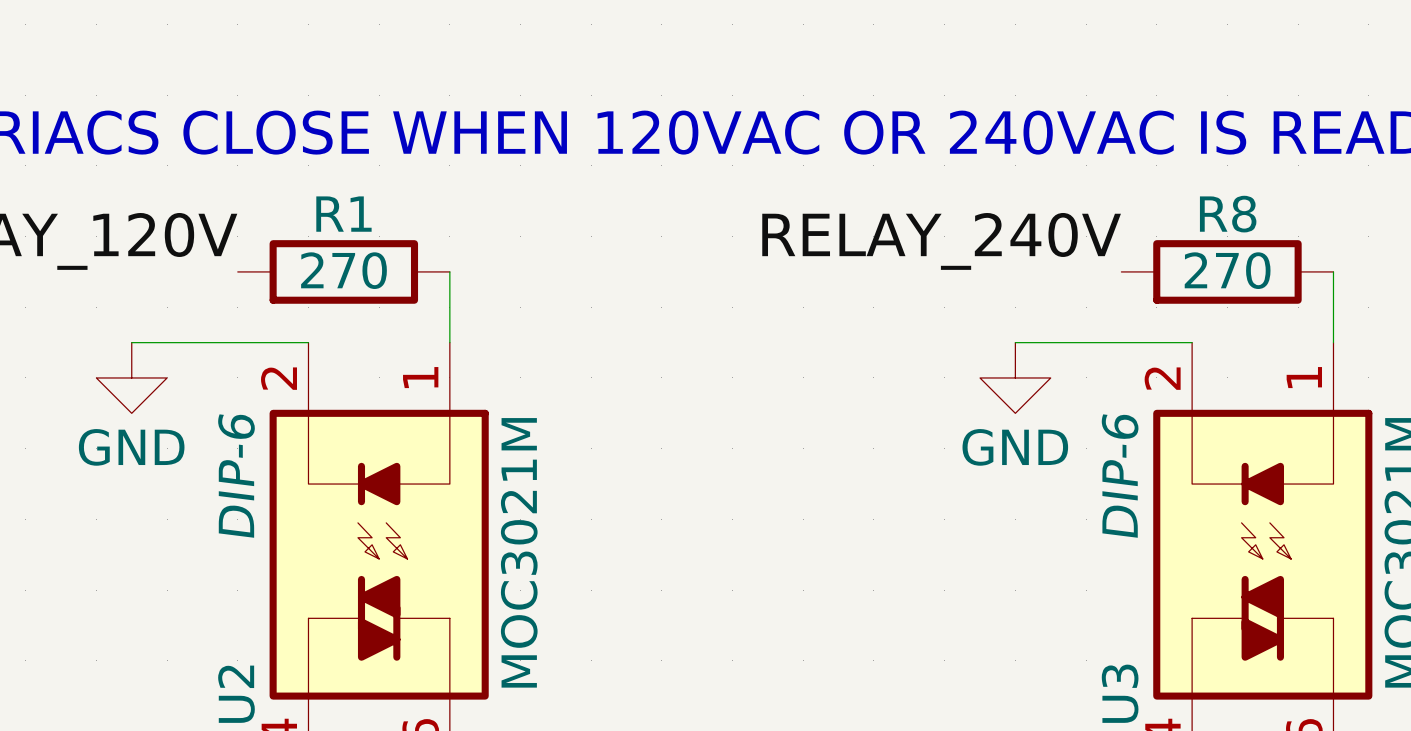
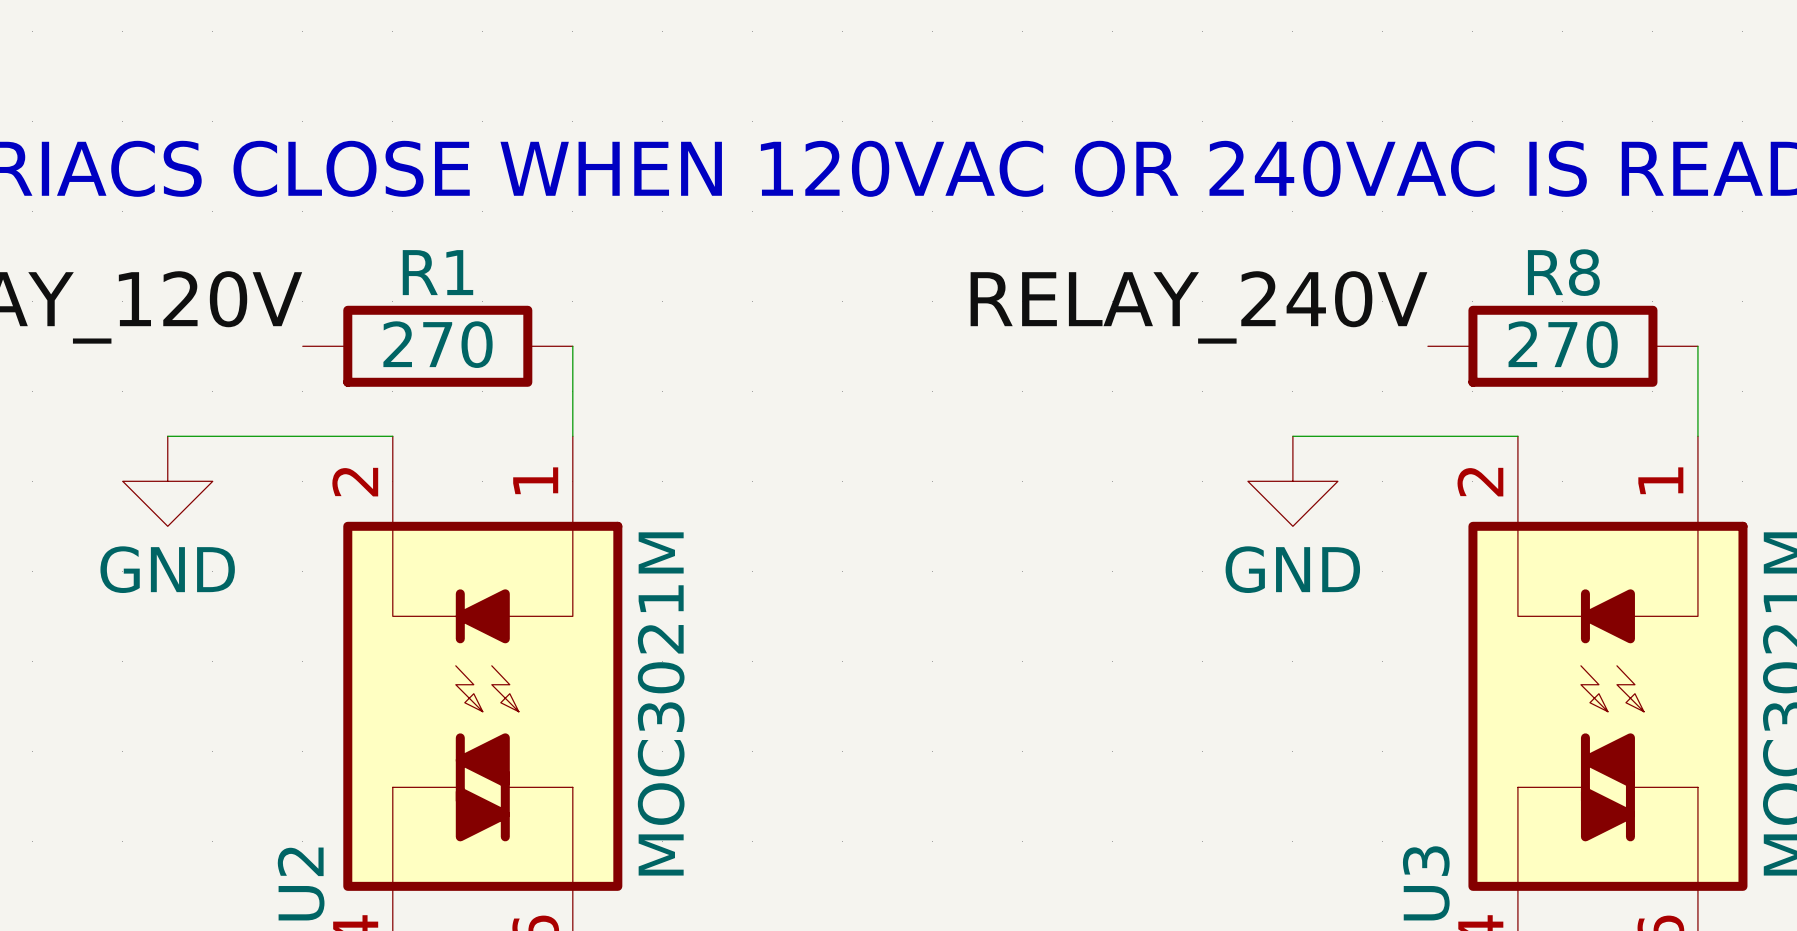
U2 text: DIP-6 (236, 476) -> none
U3 text: DIP-6 (1120, 476) -> none

